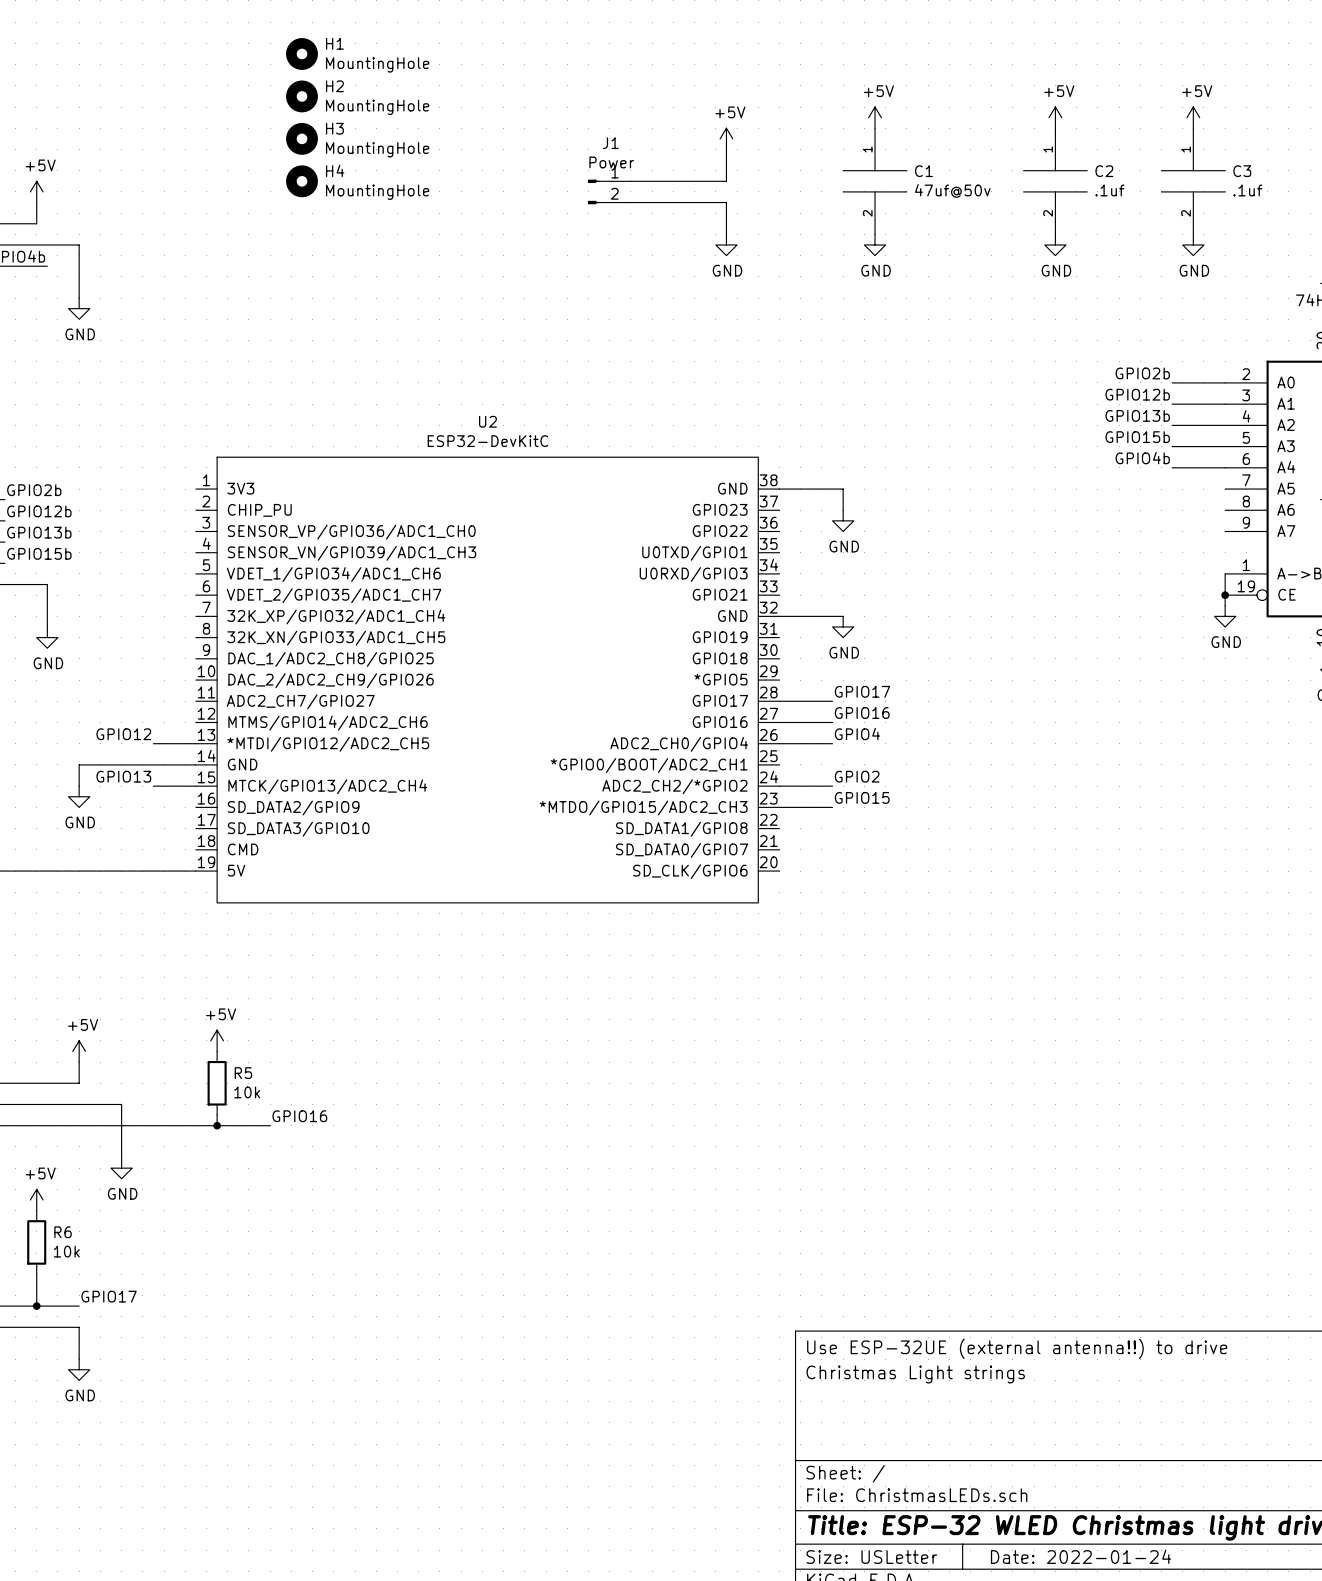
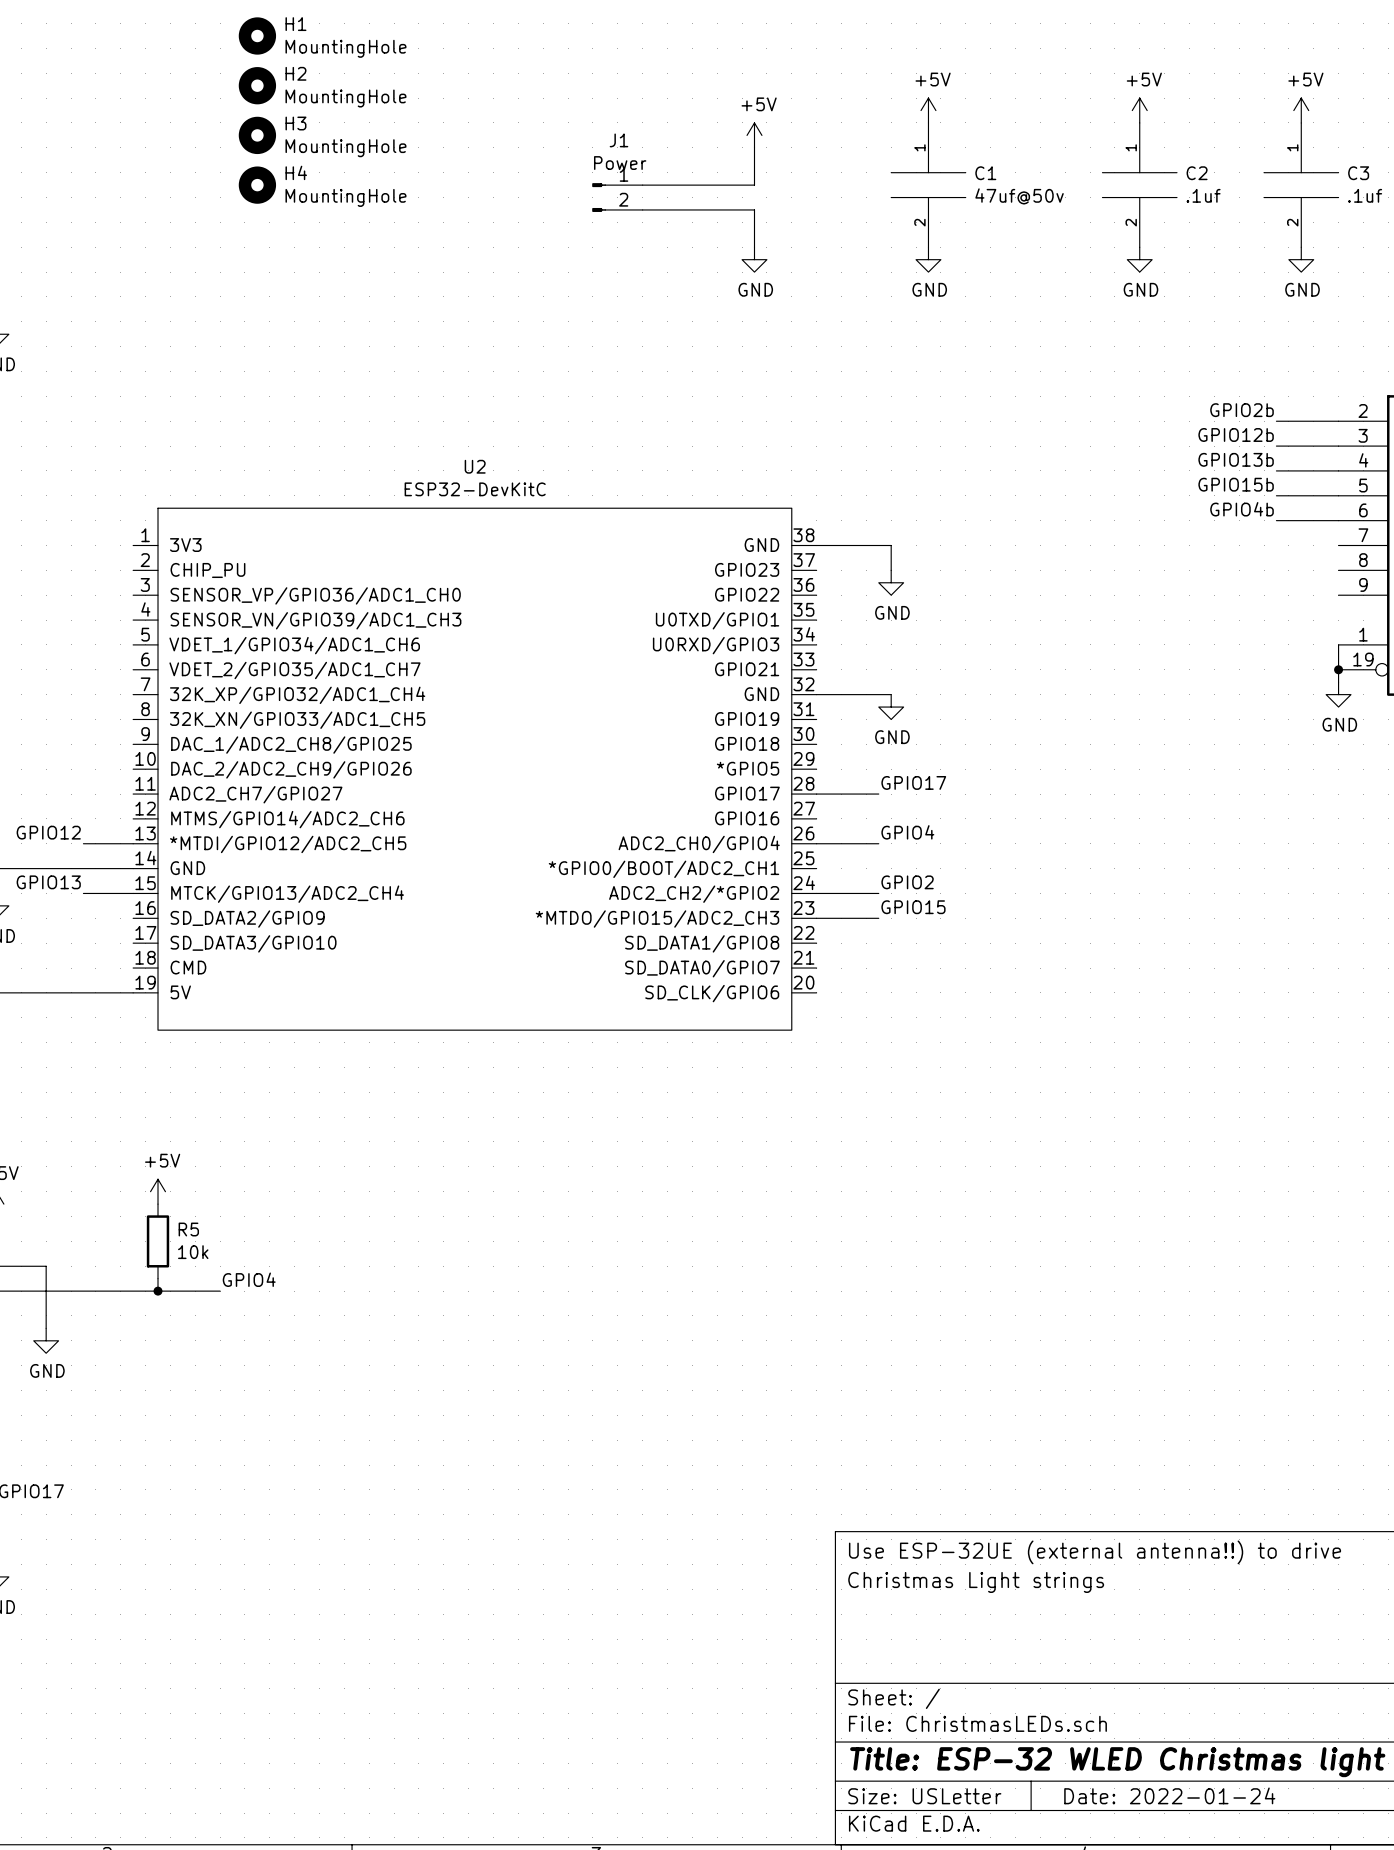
label: GPIO16 (862, 713) -> none
wire: (779, 722) (832, 722) -> none
label: GPIO16 (299, 1116) -> GPIO4 (249, 1279)

